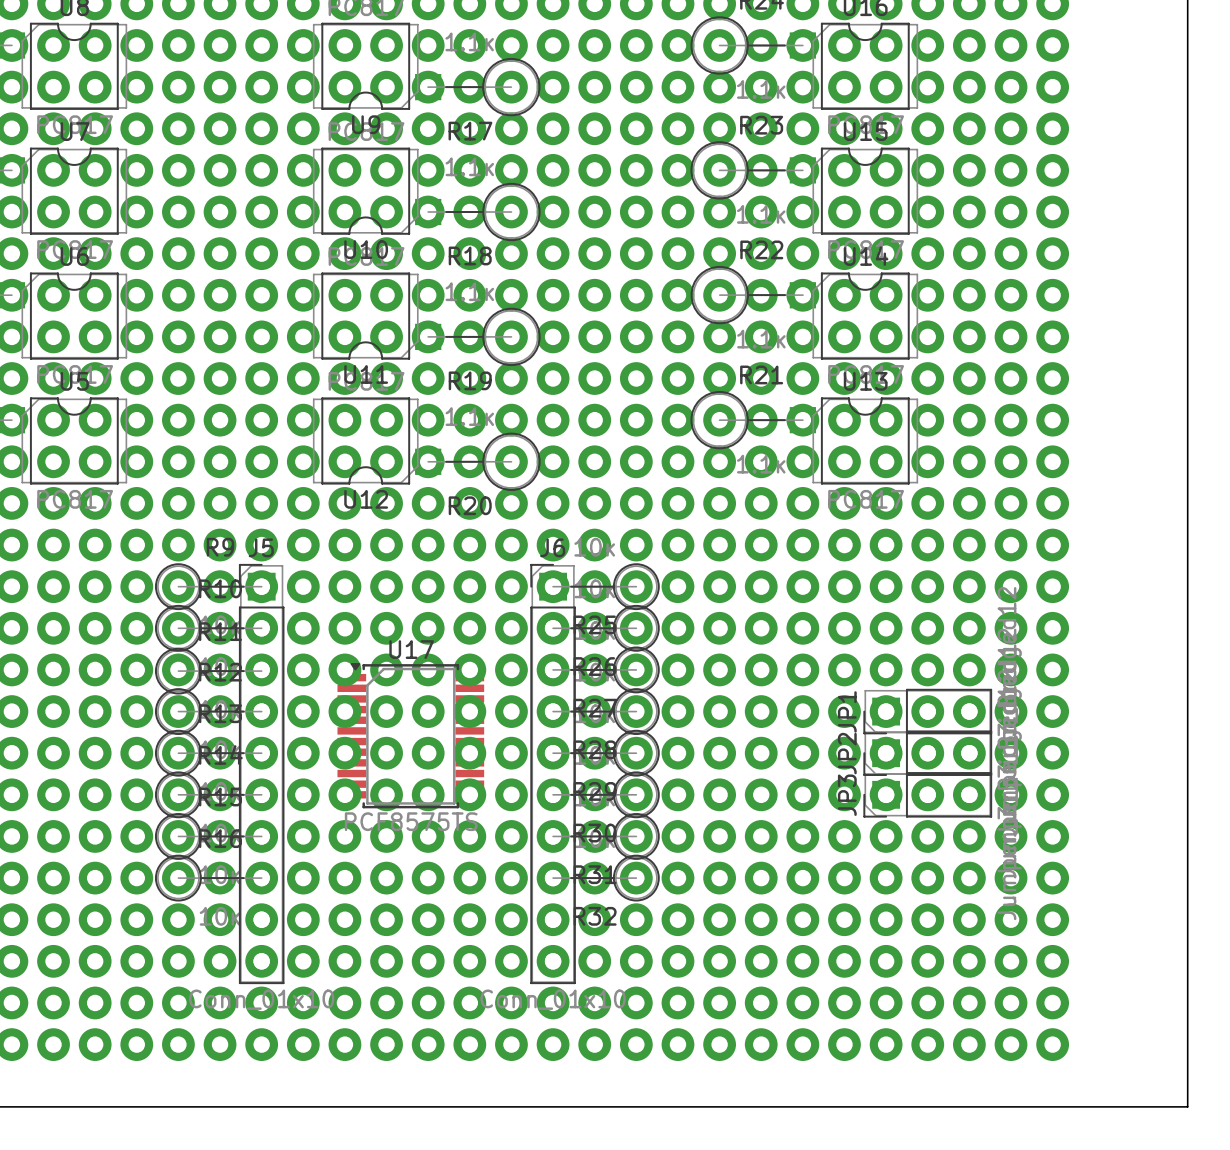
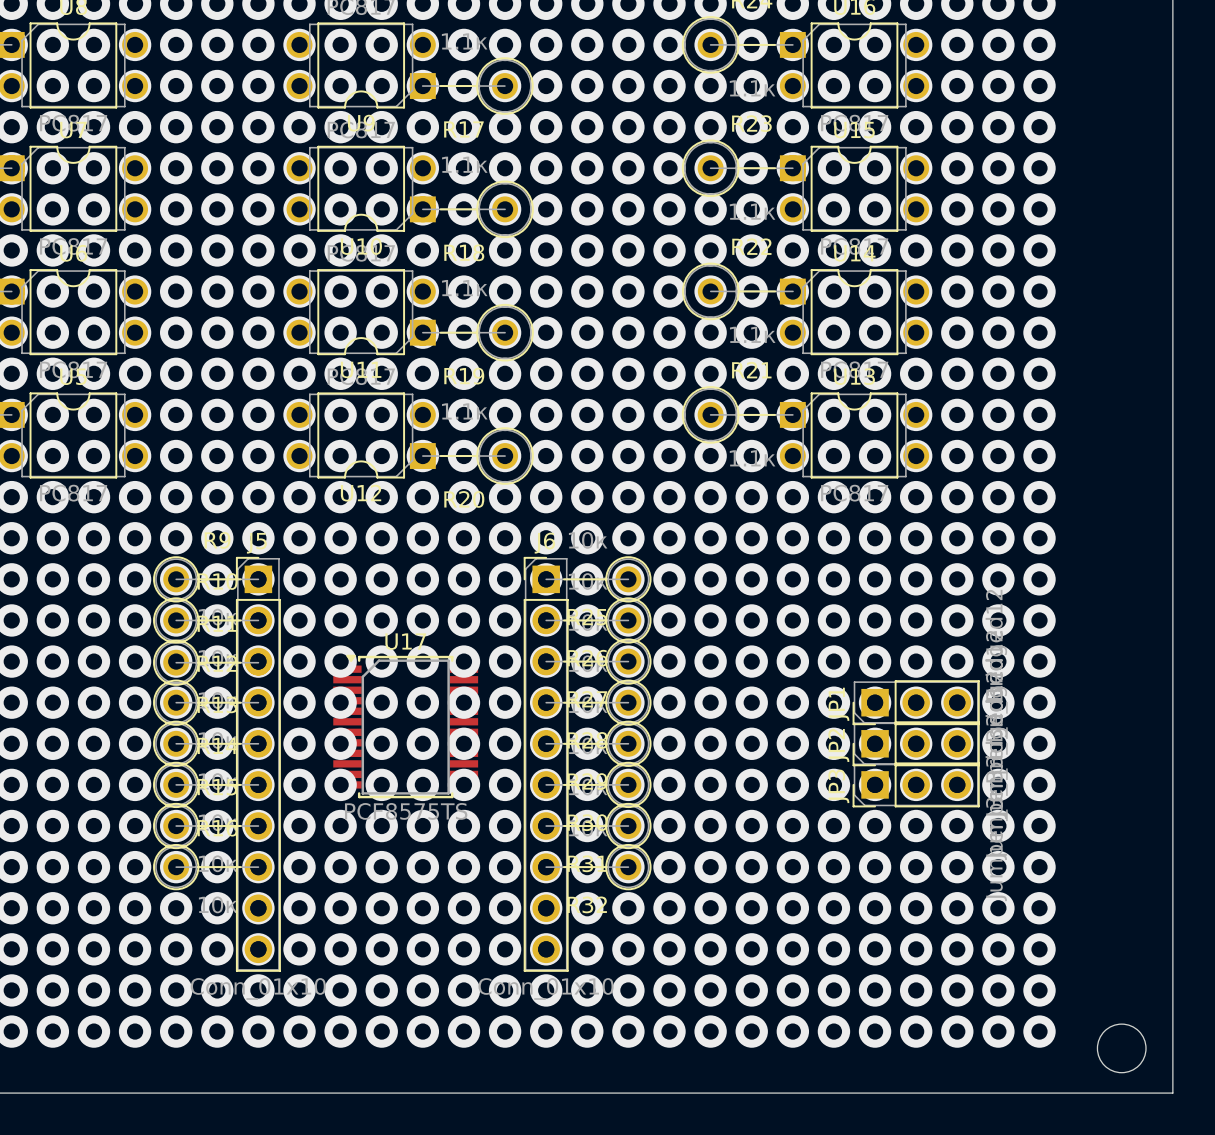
round board edge: none -> [1097, 1023, 1147, 1074]

